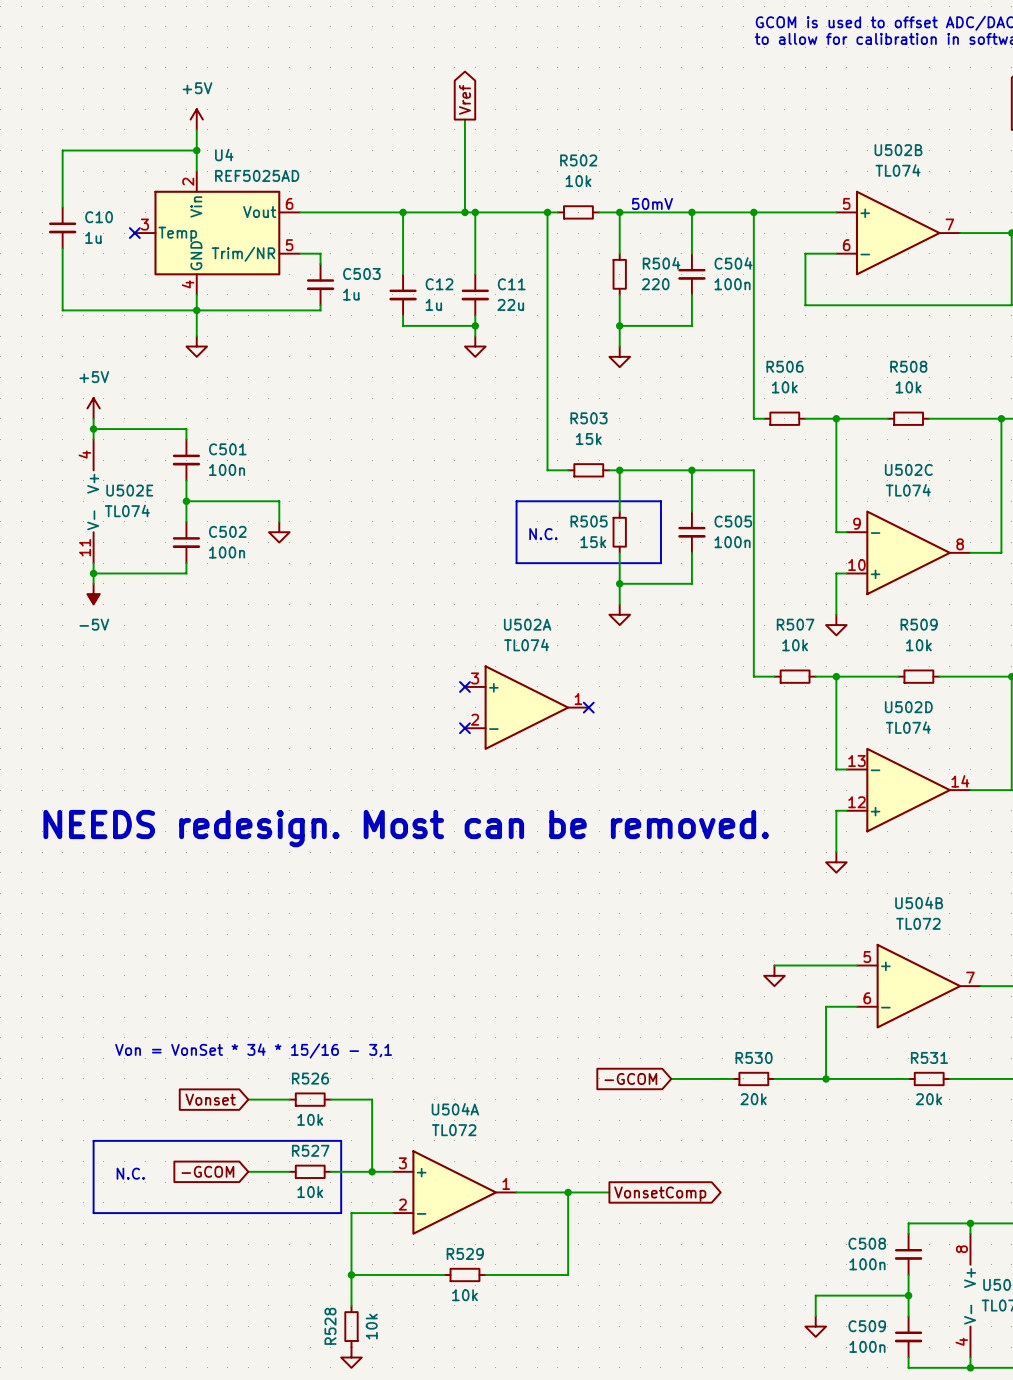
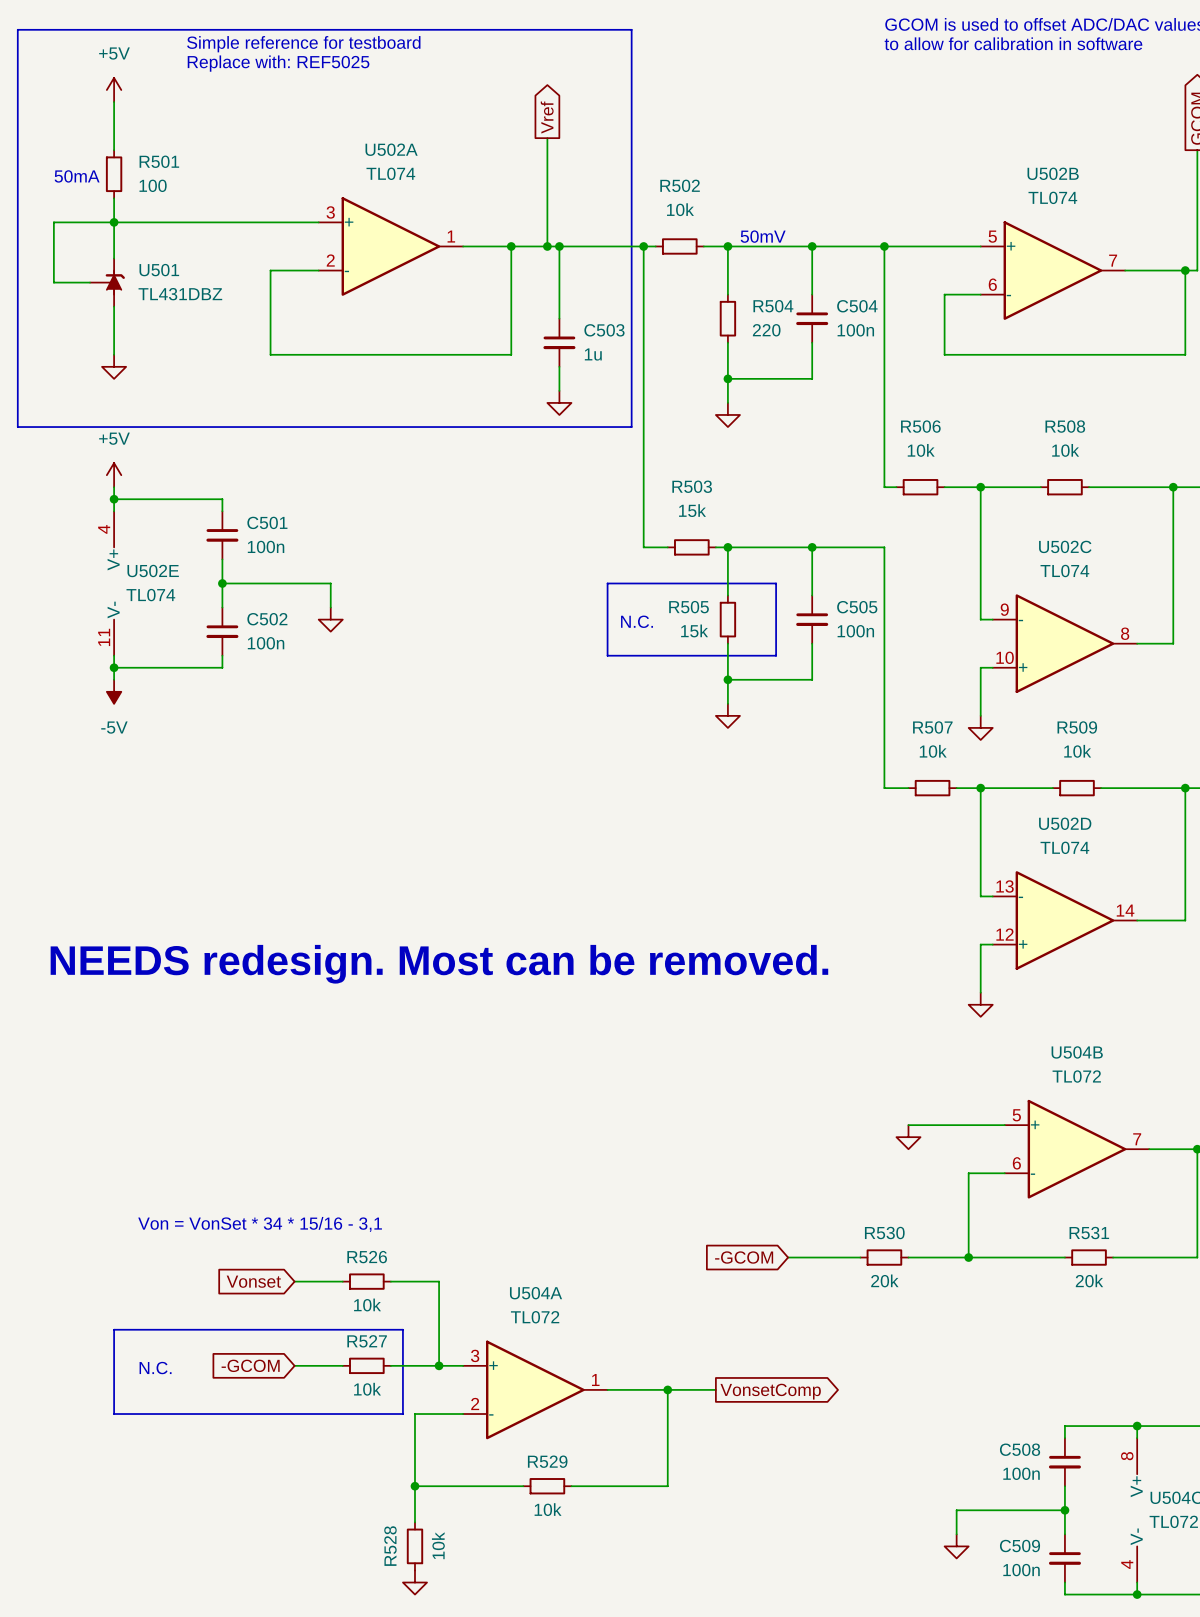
line: none -> (17, 29) (631, 29) (631, 427) (17, 427) (17, 29)
text: none -> Simple reference for testboard (303, 44)
text: none -> Replace with: REF5025 (278, 63)
power symbol position: +5V (196, 119) -> +5V (114, 90)
wire: (196, 129) (196, 171) -> (114, 102) (114, 150)
R501: none -> 100 (114, 174)
wire: (196, 150) (62, 150) (62, 207) -> none
junction: (196, 150) -> none
text: none -> 50mA (77, 176)
wire: none -> (114, 198) (114, 258)
junction: none -> (114, 222)
wire: none -> (318, 222) (53, 222) (53, 282) (90, 282)
wire: (403, 212) (403, 274) -> none
junction position: (403, 212) -> (511, 246)
wire: none -> (511, 246) (511, 354) (270, 354) (270, 270) (318, 270)
C10: 1u (62, 227) -> none
no-connect mark: (134, 233) -> none
U4: REF5025AD (217, 233) -> none
U501: none -> TL431DBZ (107, 282)
wire: (62, 248) (62, 310) (320, 310) (320, 305) -> none
wire: (299, 253) (320, 253) (320, 264) -> none
C503: 1u (320, 284) -> none
C11 name: C11 (511, 284) -> C503 (604, 330)
wire: (196, 294) (196, 336) -> (114, 306) (114, 354)
C12: 1u (403, 294) -> none
C11 value: 22u (510, 304) -> 1u (593, 354)
junction: (196, 310) -> none
wire: (403, 315) (403, 325) (475, 325) -> none
junction: (475, 325) -> none
power symbol position: (196, 346) -> (114, 366)
no-connect mark: (464, 686) -> none
U502A position: (526, 707) -> (390, 246)
no-connect mark: (588, 707) -> none
no-connect mark: (464, 728) -> none

